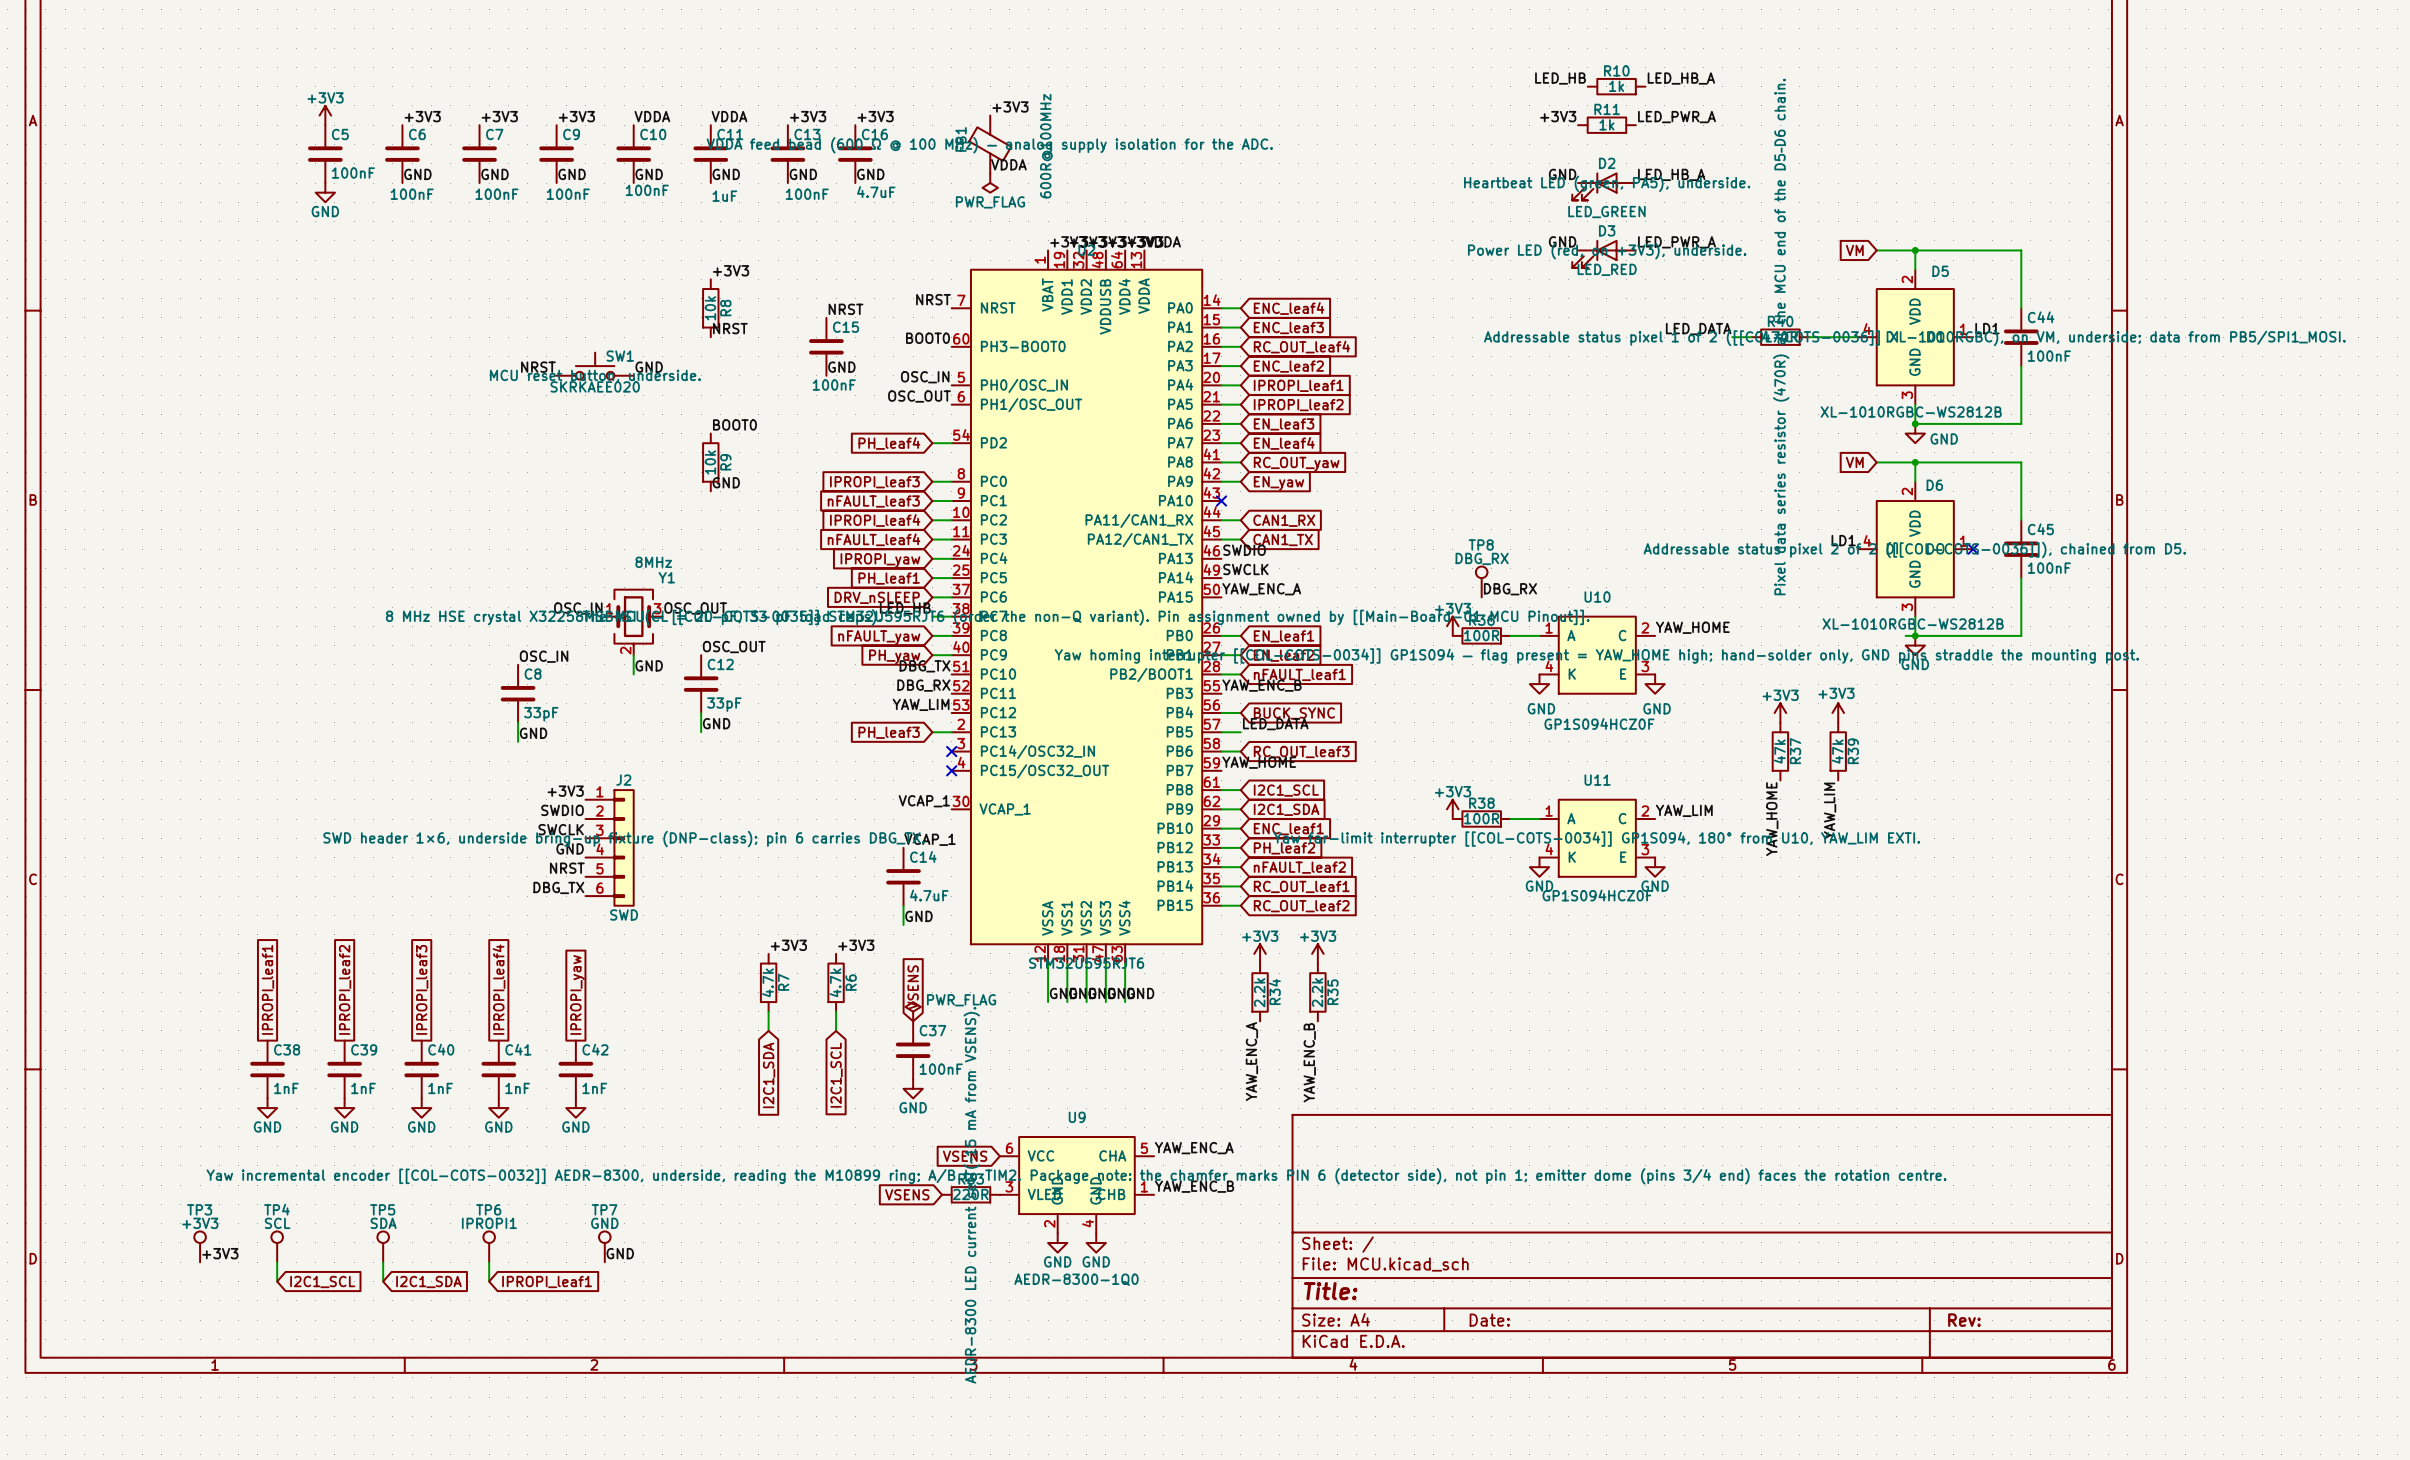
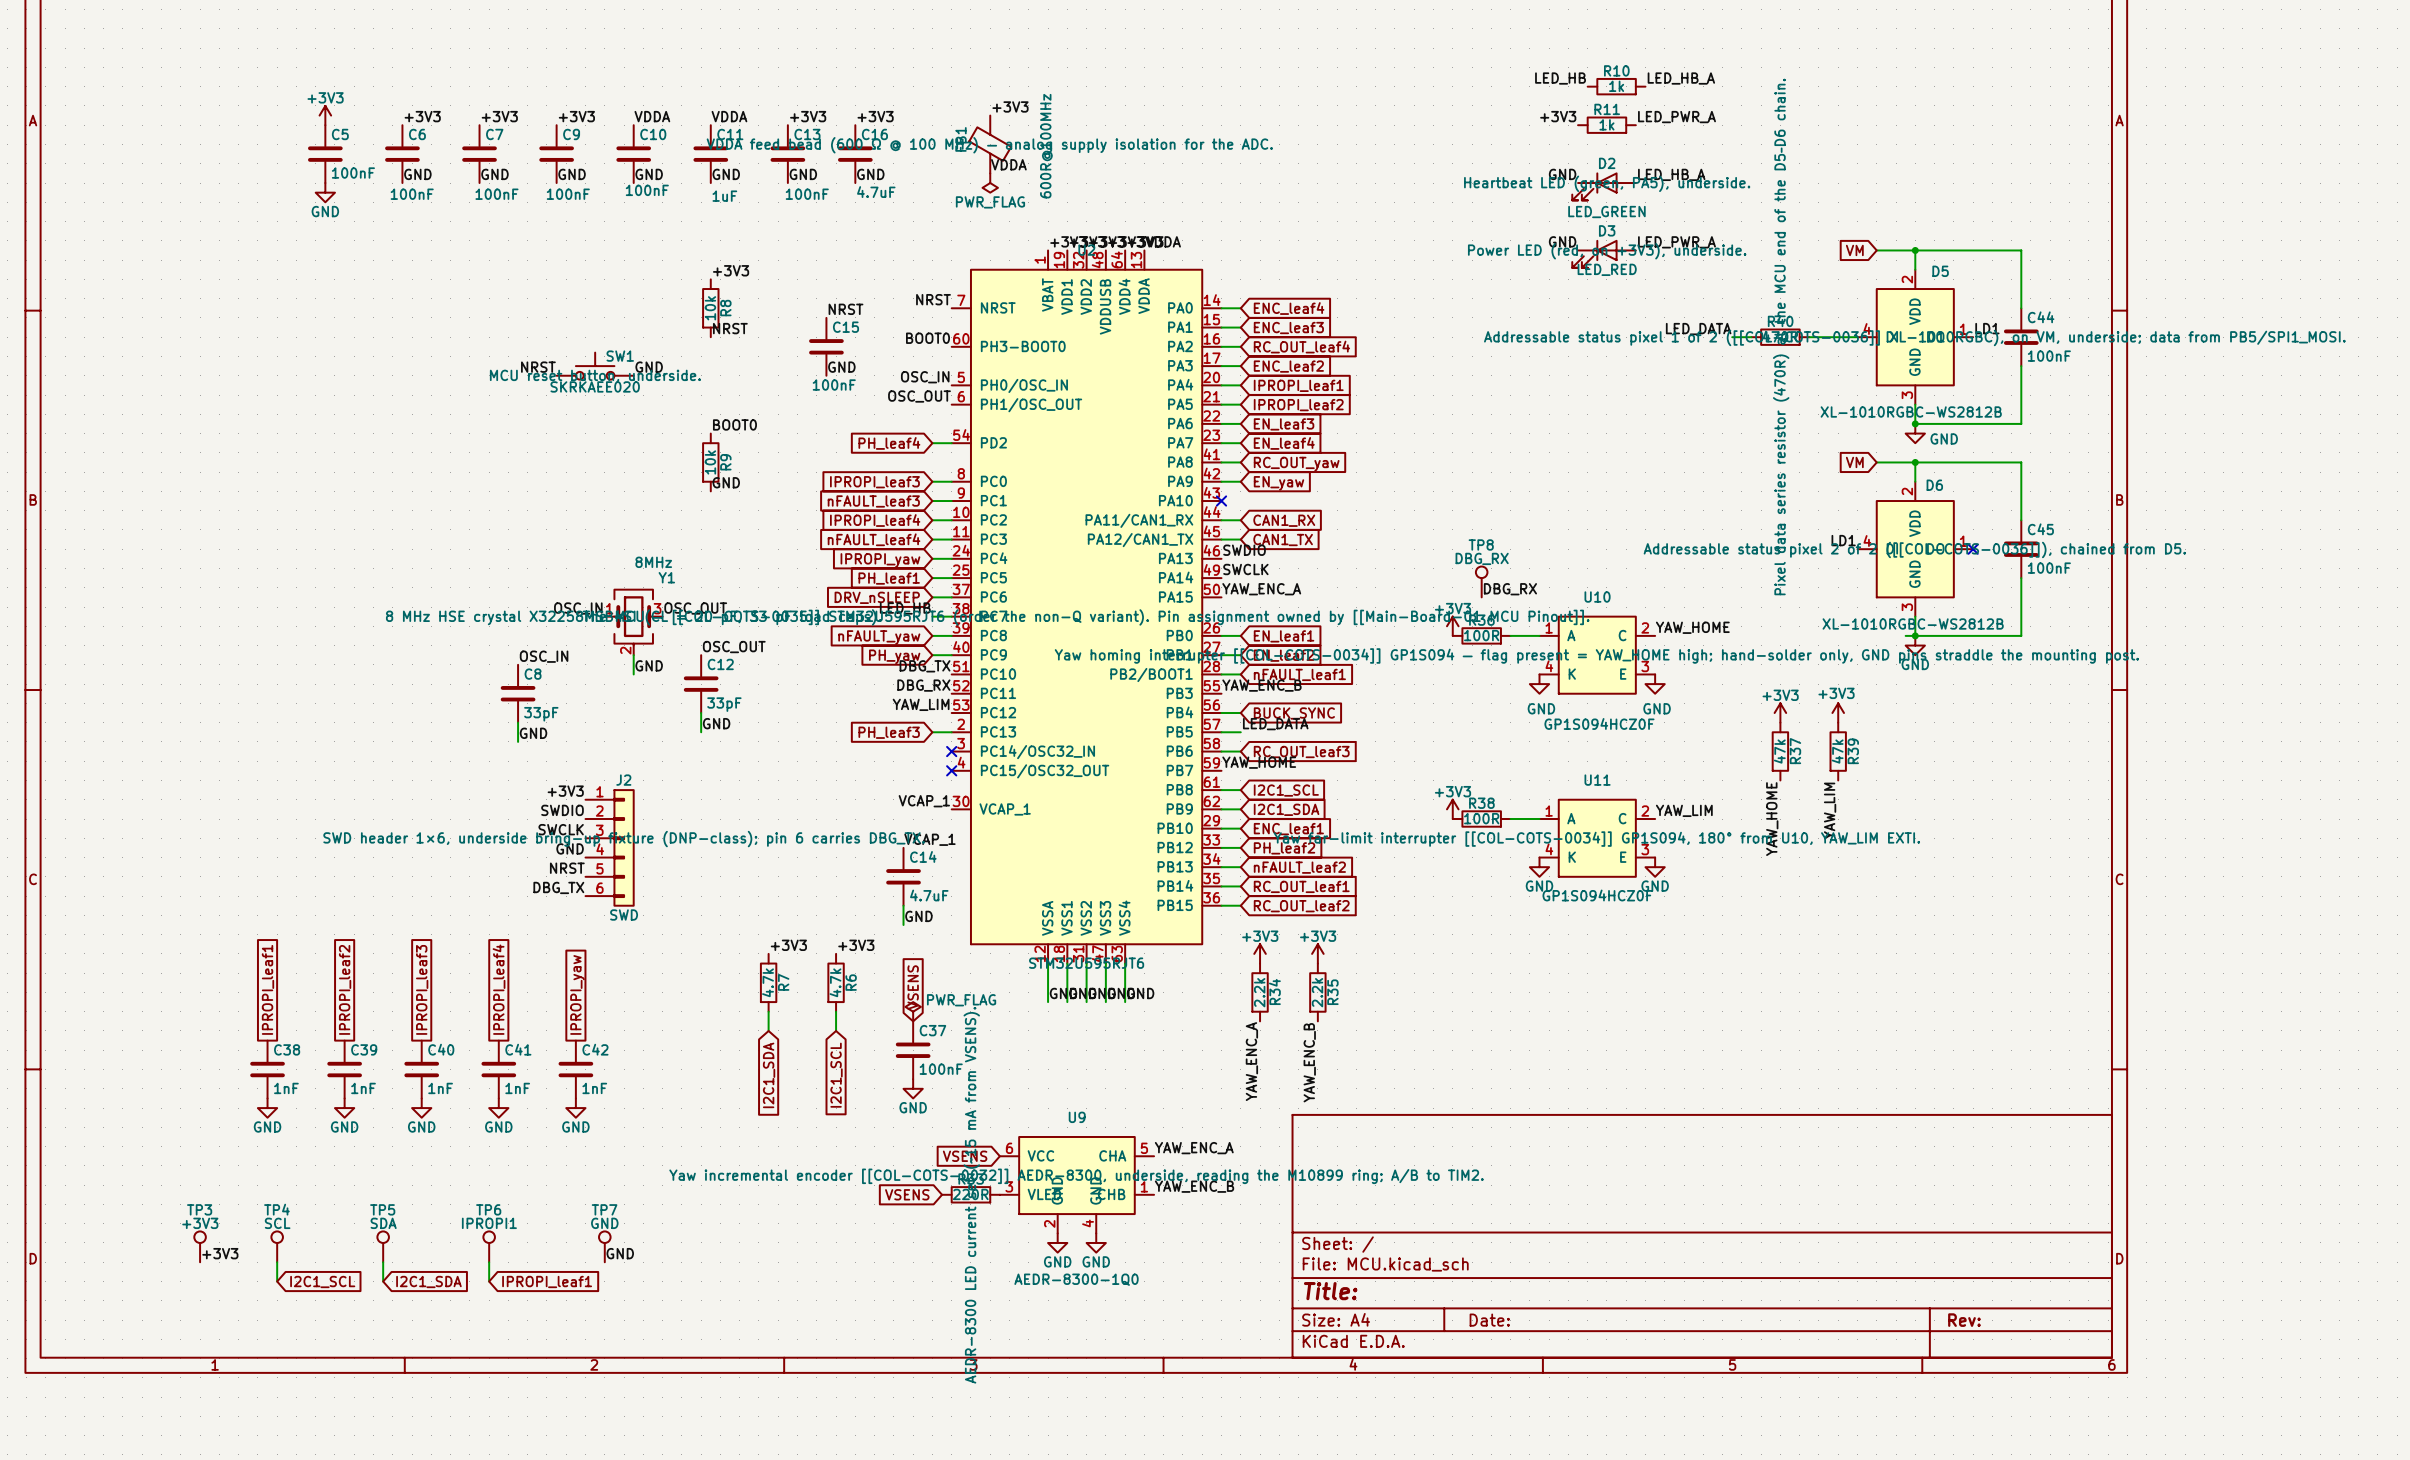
U9 text: Yaw incremental encoder [[COL-COTS-0032]] AEDR-8300, underside, reading the M10899 ring; A/B to TIM2. Package note: the chamfer marks PIN 6 (detector side), not pin 1; emitter dome (pins 3/4 end) faces the rotation centre. (1076, 1176) -> Yaw incremental encoder [[COL-COTS-0032]] AEDR-8300, underside, reading the M10899 ring; A/B to TIM2. (1076, 1176)

